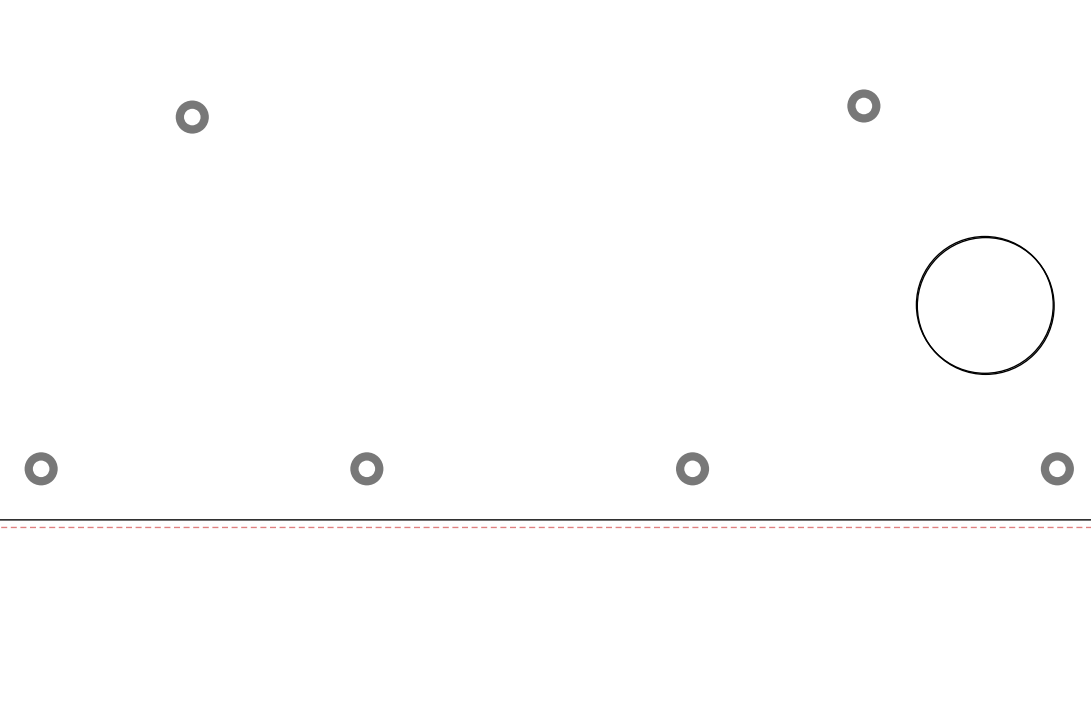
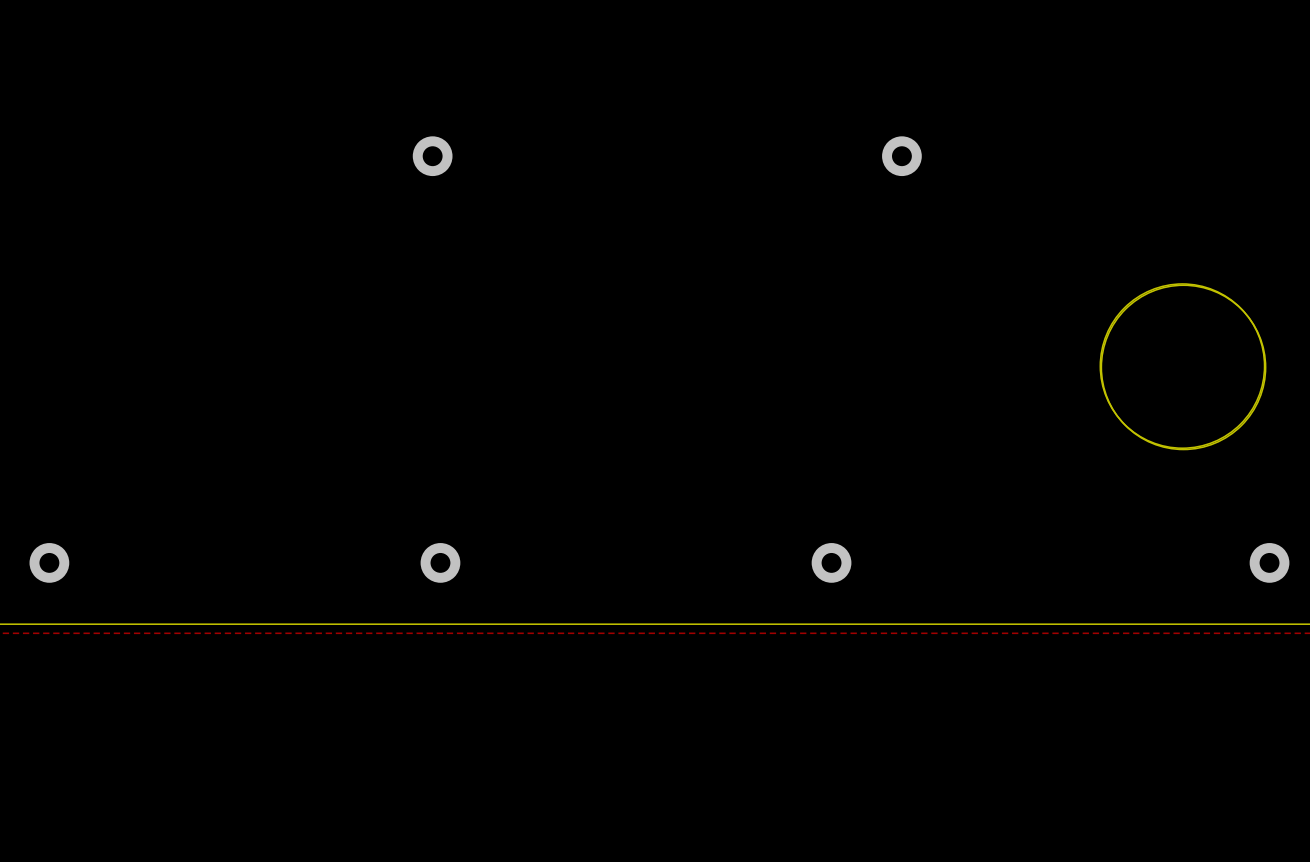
via position: (863, 105) -> (901, 156)
via: (192, 117) -> none
via: none -> (432, 156)

